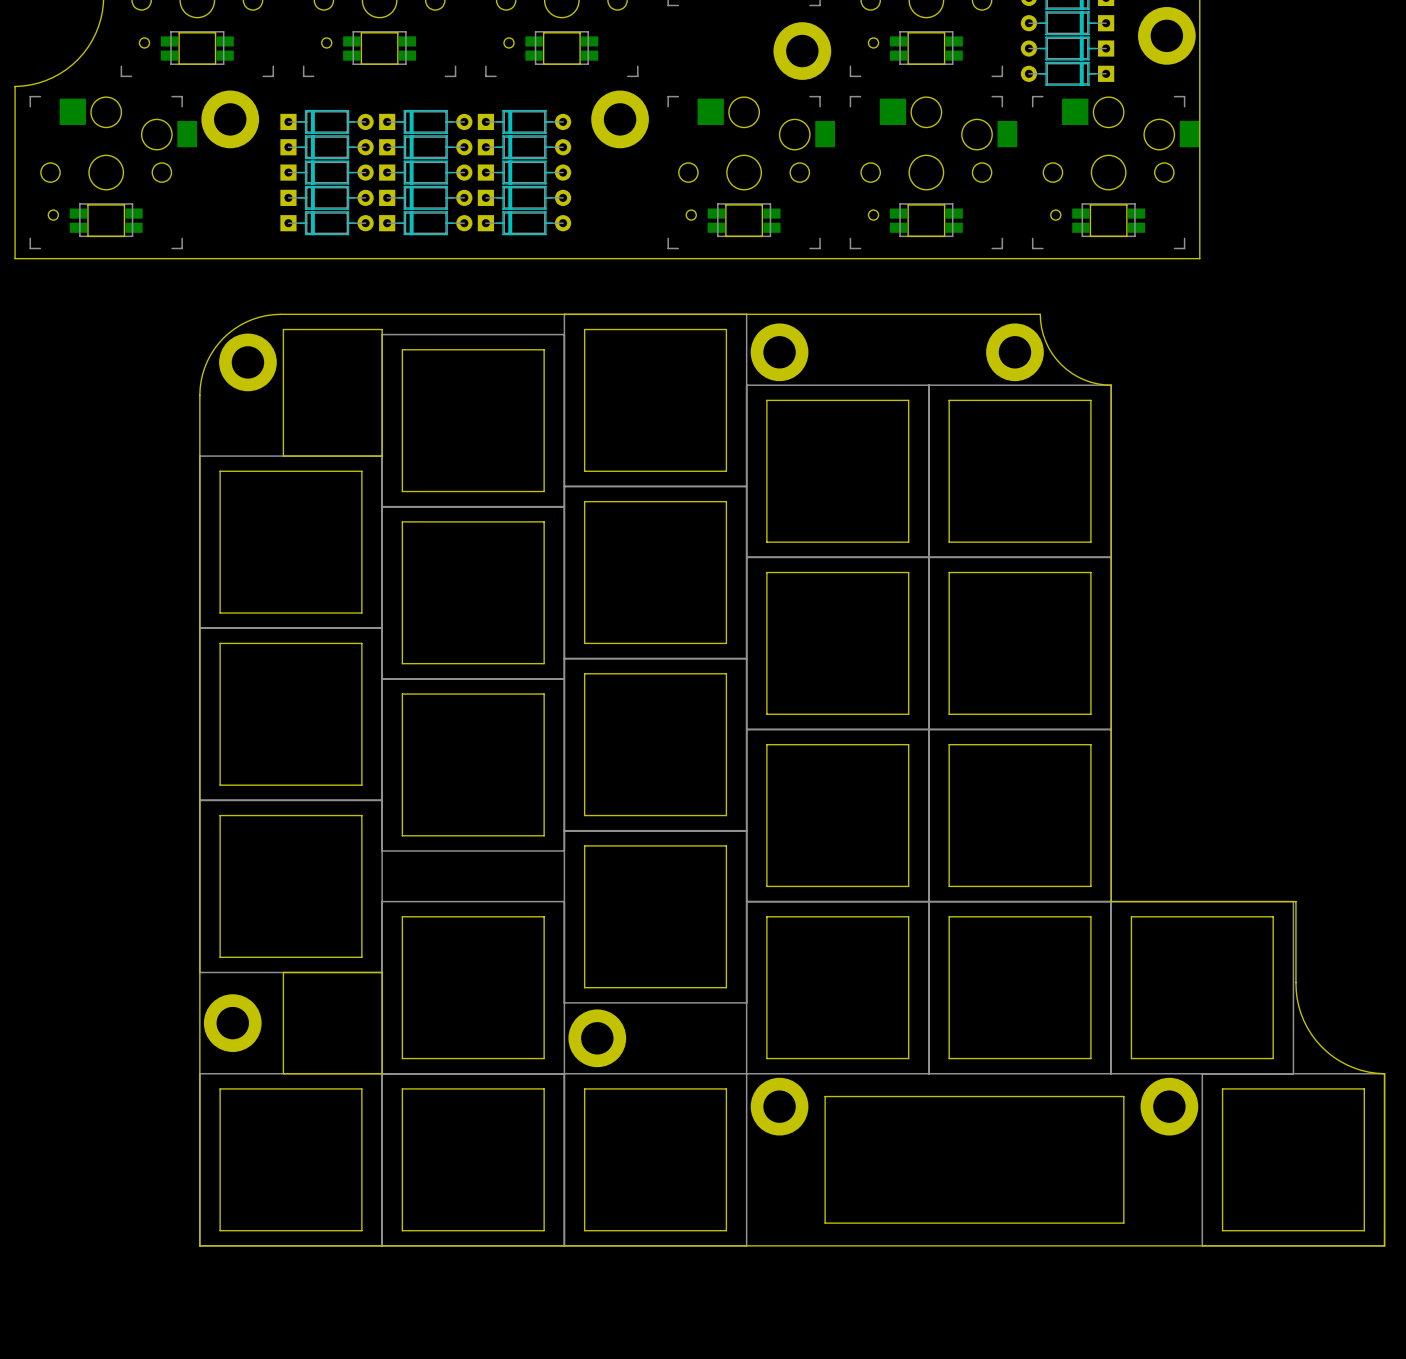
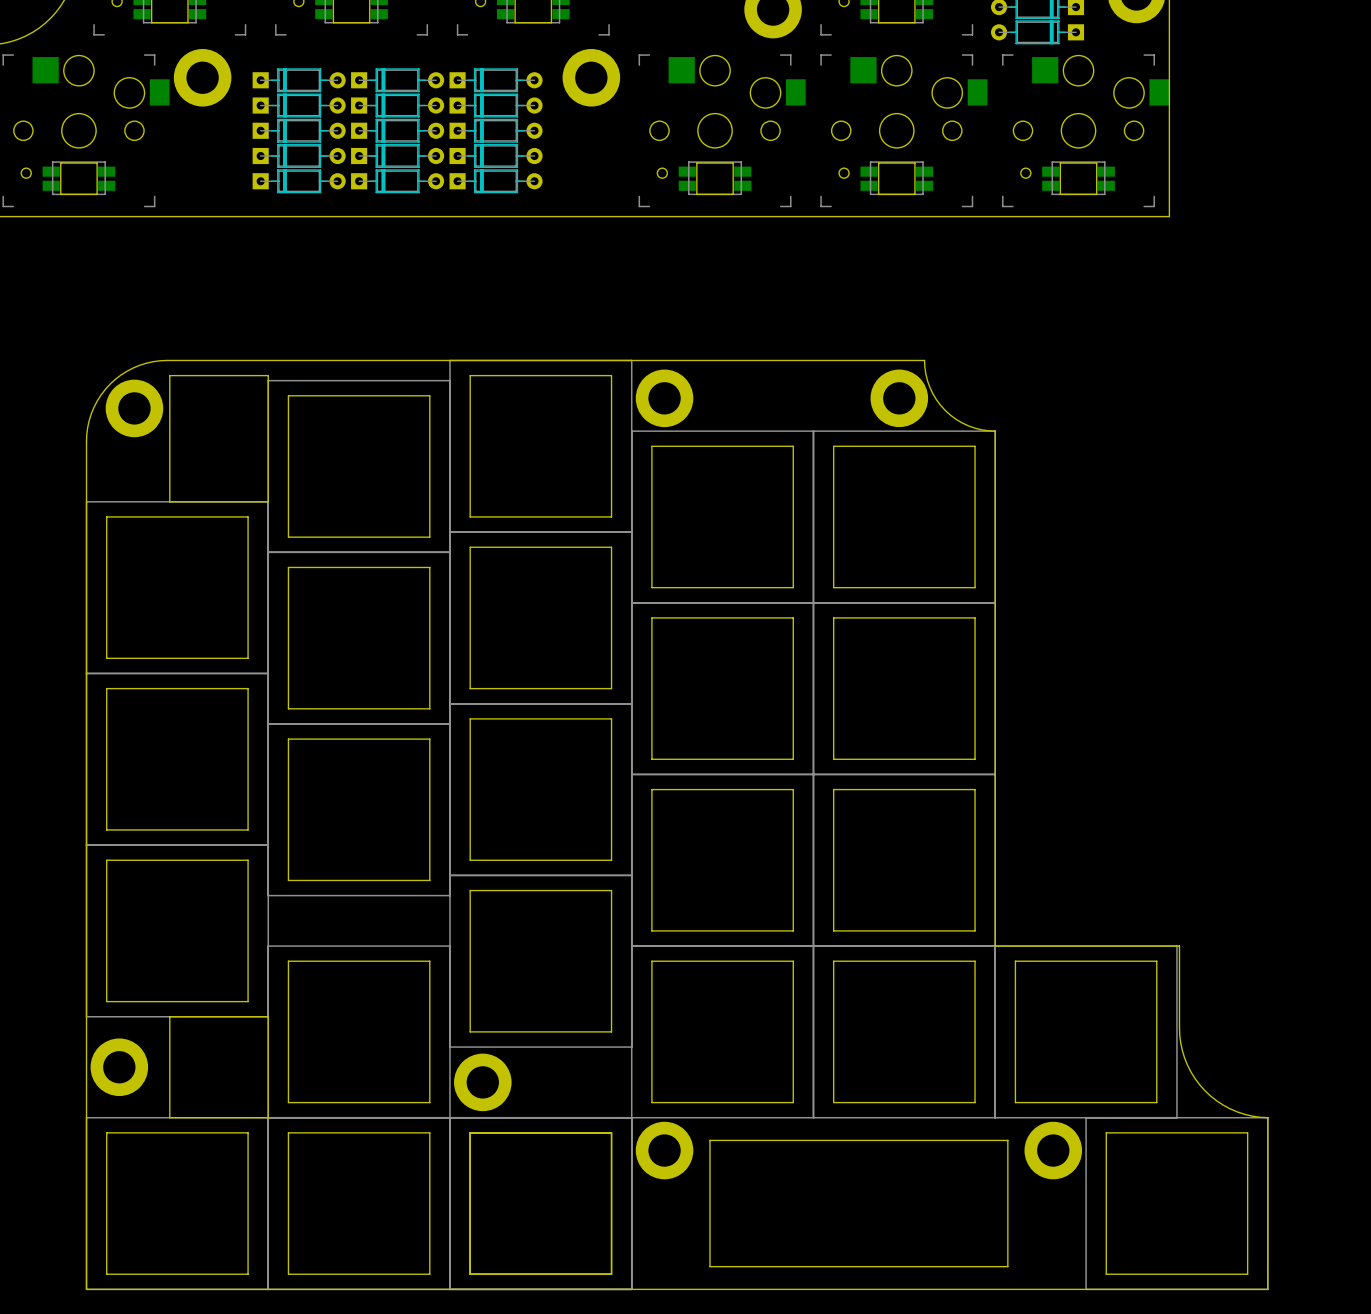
drawing: [199, 313, 1386, 1247] -> none
board edge: (280, 314) (1040, 314) (1045, 341) (1061, 364) (1084, 379) (1111, 385) (1111, 901) (1295, 901) (1296, 990) (1300, 1013) (1307, 1027) (1321, 1046) (1339, 1061) (1361, 1070) (1384, 1073) (1384, 1245) (199, 1245) (200, 388) (207, 361) (218, 343) (228, 333) (253, 319) (280, 314) -> (167, 360) (924, 360) (929, 387) (945, 410) (968, 425) (995, 431) (995, 946) (1179, 946) (1179, 1034) (1184, 1057) (1190, 1071) (1204, 1090) (1223, 1105) (1244, 1114) (1267, 1117) (1267, 1289) (86, 1289) (86, 434) (89, 420) (97, 400) (115, 379) (139, 365) (167, 360)
board edge: (283, 329) (382, 329) (382, 456) (283, 456) (283, 329) -> (169, 375) (268, 375) (268, 501) (169, 501) (169, 375)
part: (779, 352) -> none
part: (1014, 352) -> none
part position: (247, 362) -> (134, 408)
drawing: none -> [85, 359, 1269, 1291]
part: none -> (664, 398)
part: none -> (899, 398)
board edge: (283, 972) (283, 1073) (382, 1073) (382, 972) (283, 972) -> (169, 1016) (169, 1117) (268, 1117) (268, 1016) (169, 1016)
part position: (232, 1023) -> (119, 1067)
part: (597, 1038) -> none
board edge: (825, 1096) (1123, 1096) (1123, 1223) (825, 1223) (825, 1096) -> (709, 1140) (1007, 1140) (1007, 1266) (709, 1266) (709, 1140)
part: (779, 1106) -> none
part position: (1169, 1106) -> (1053, 1150)
part: none -> (482, 1082)
part: none -> (664, 1150)

